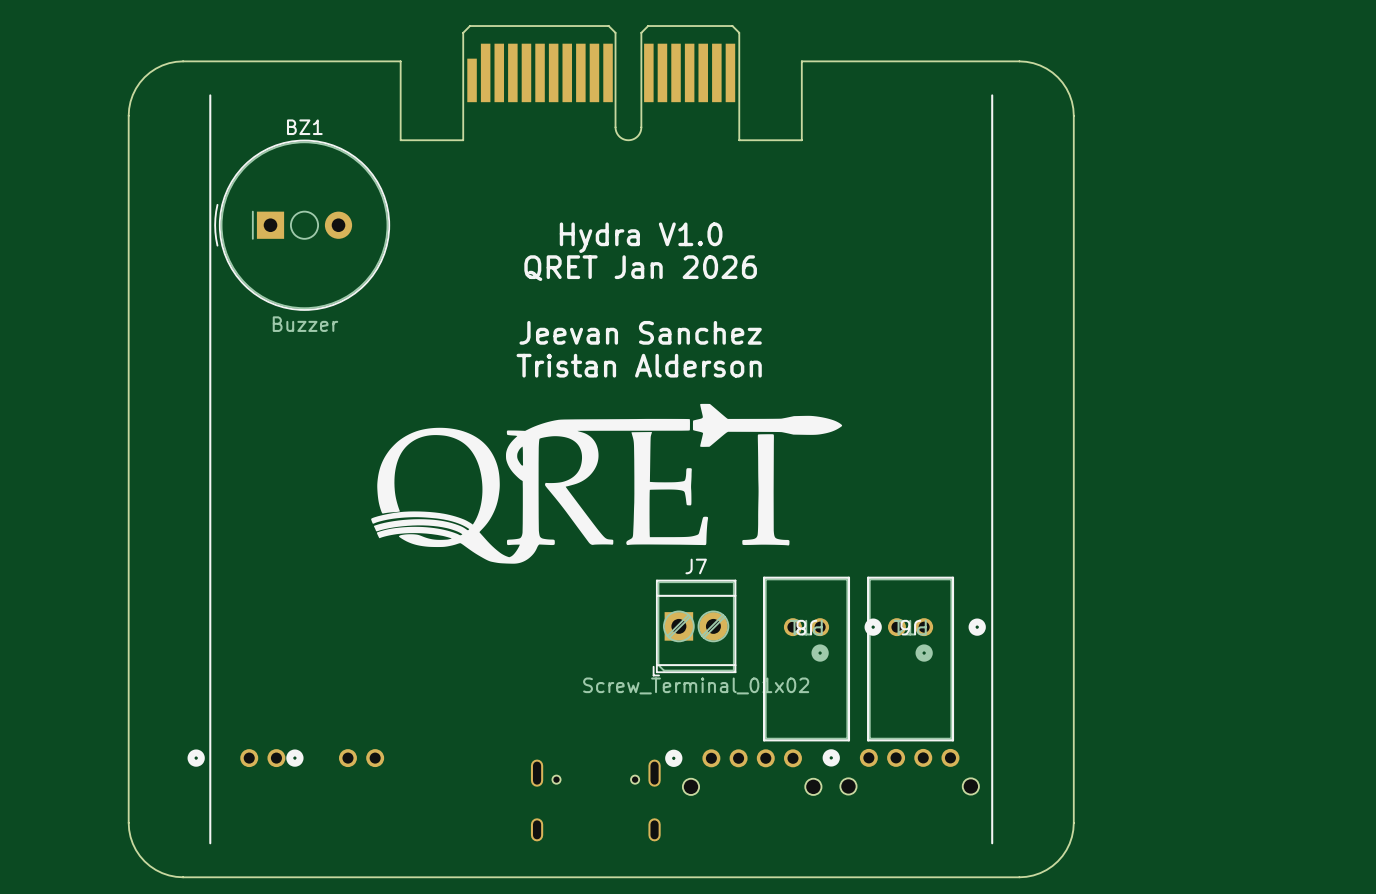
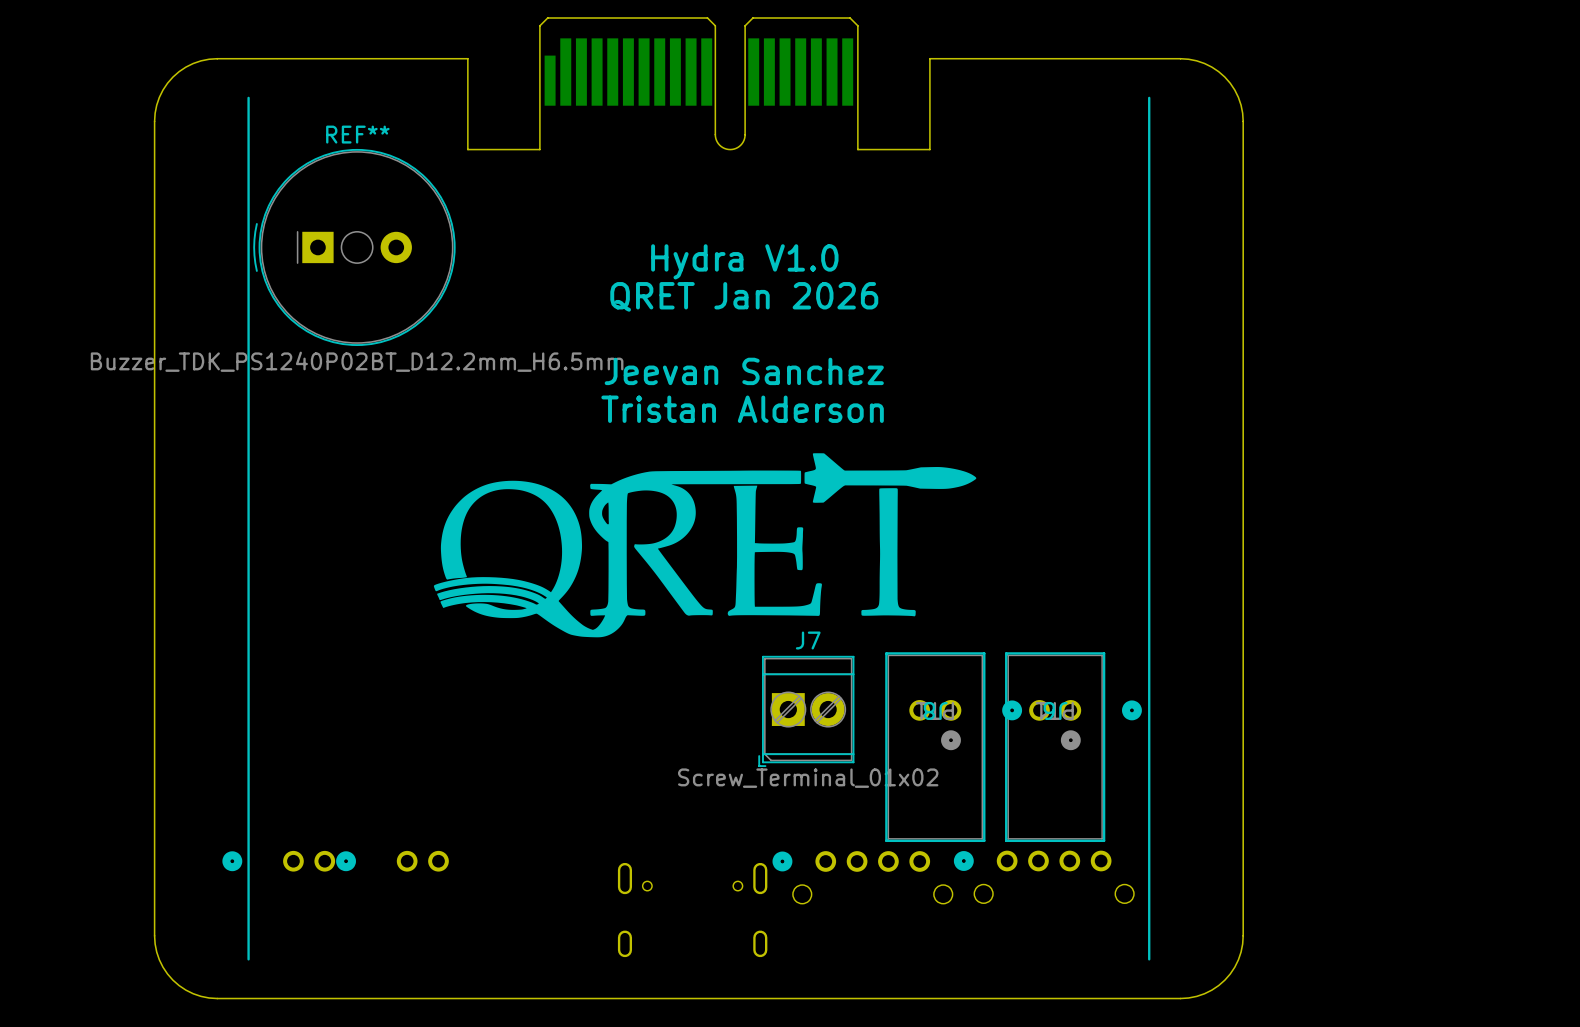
BZ1 name: BZ1 (304, 127) -> REF** (357, 134)
BZ1 value: Buzzer (305, 324) -> Buzzer_TDK_PS1240P02BT_D12.2mm_H6.5mm (357, 361)

